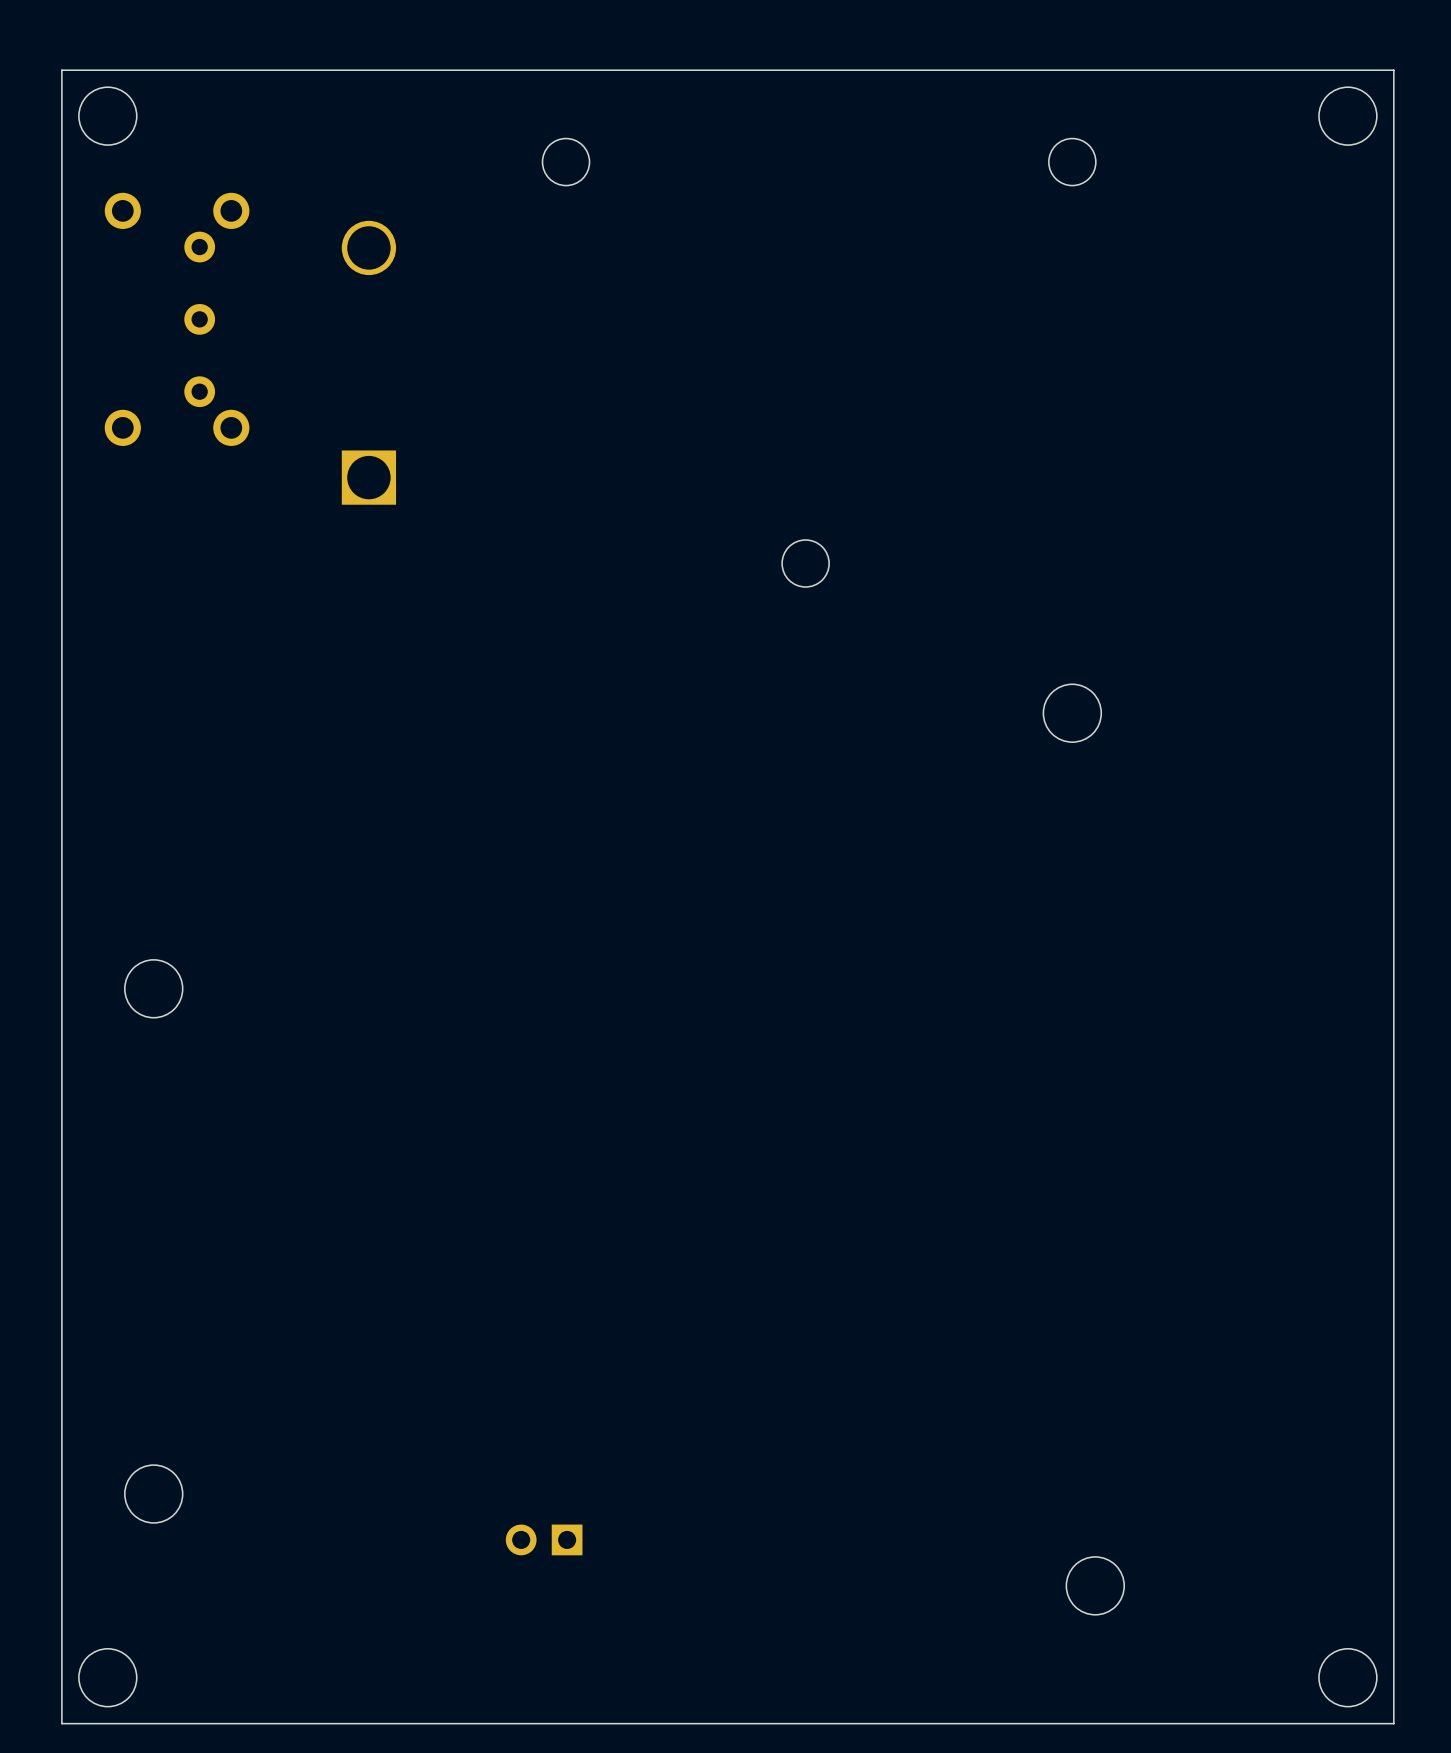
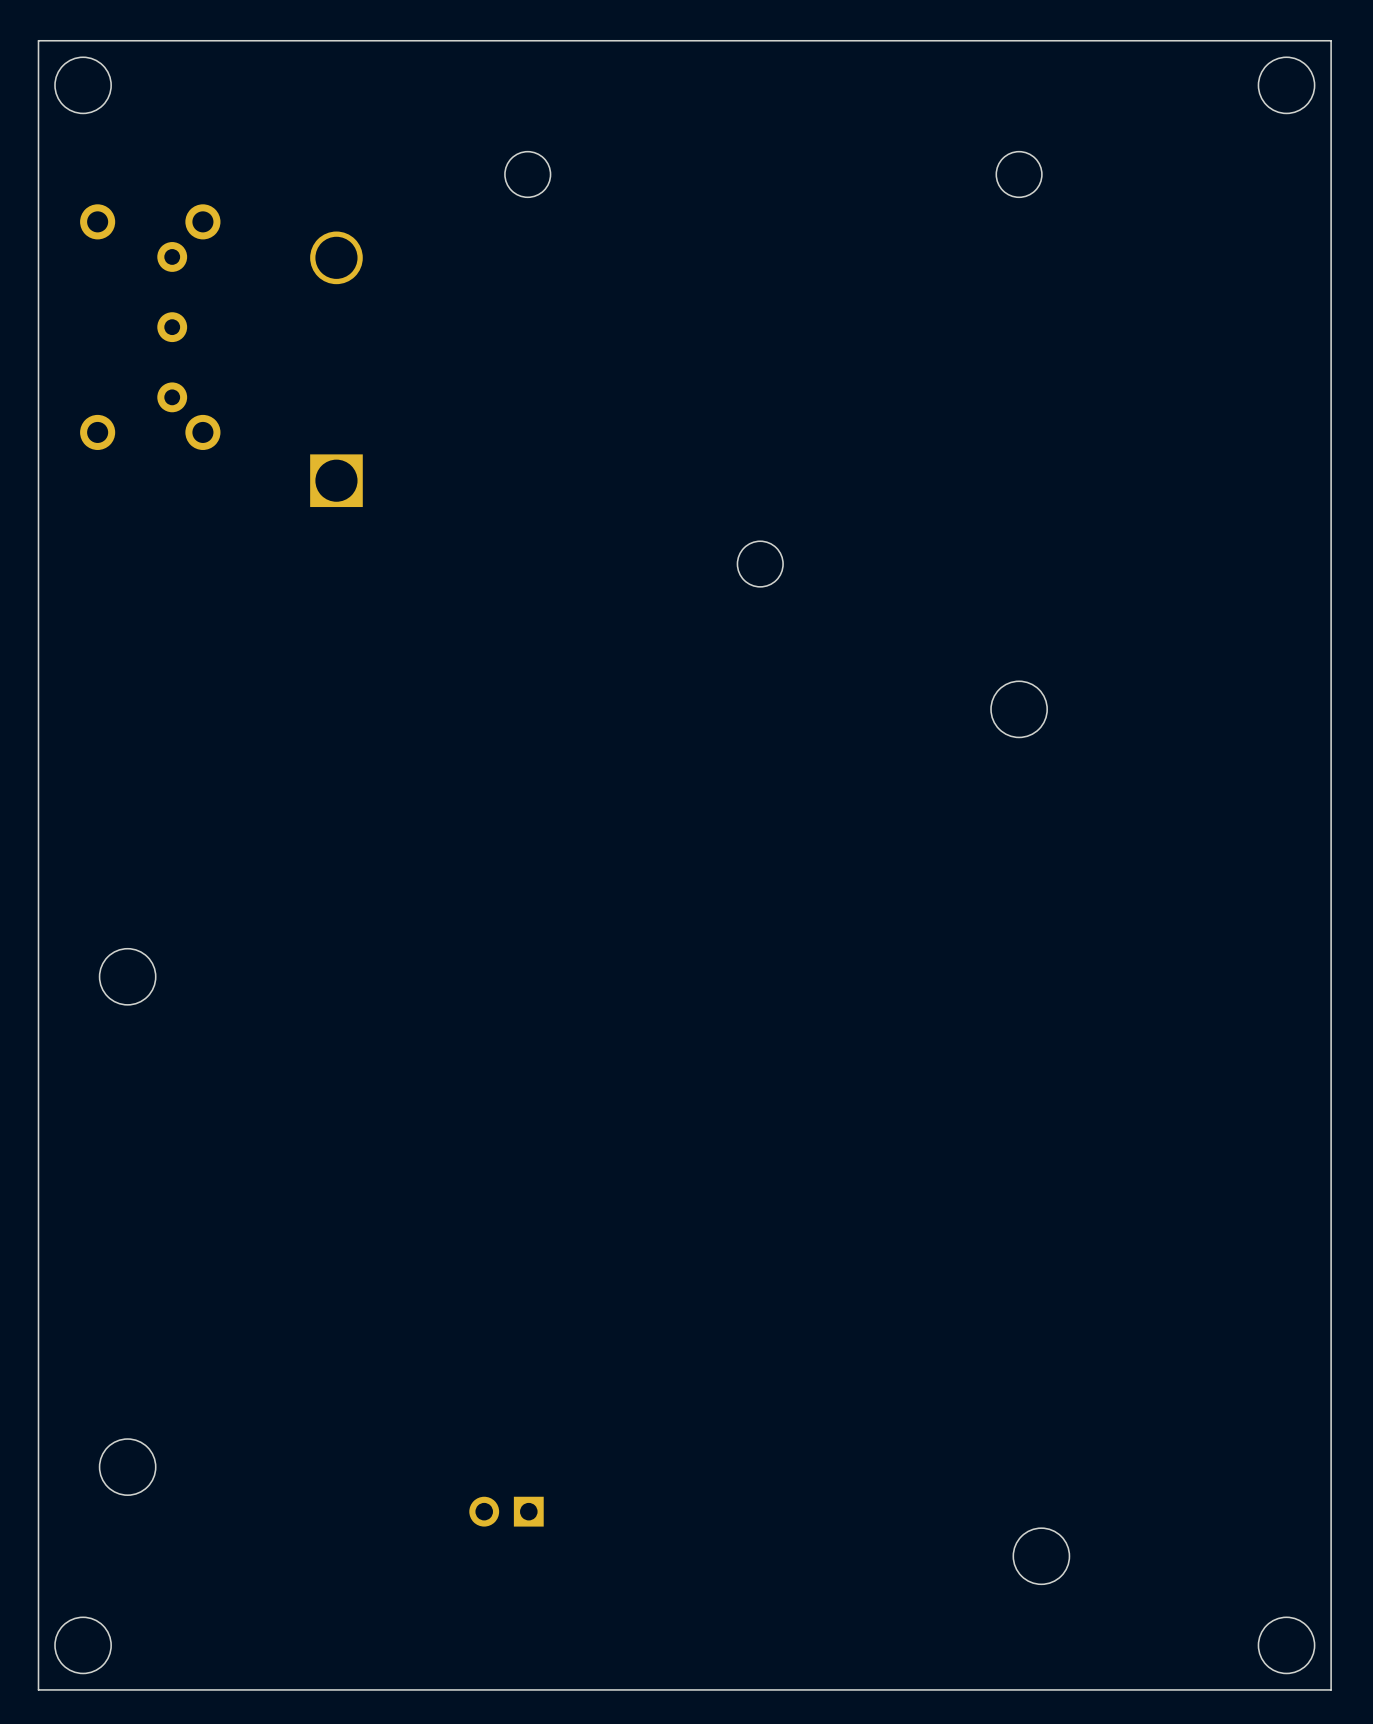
board edge: (1393, 70) (61, 70) -> (1331, 85) (1331, 40) (38, 40) (38, 85)
round board edge position: (107, 116) -> (83, 85)
round board edge position: (1347, 116) -> (1286, 85)

